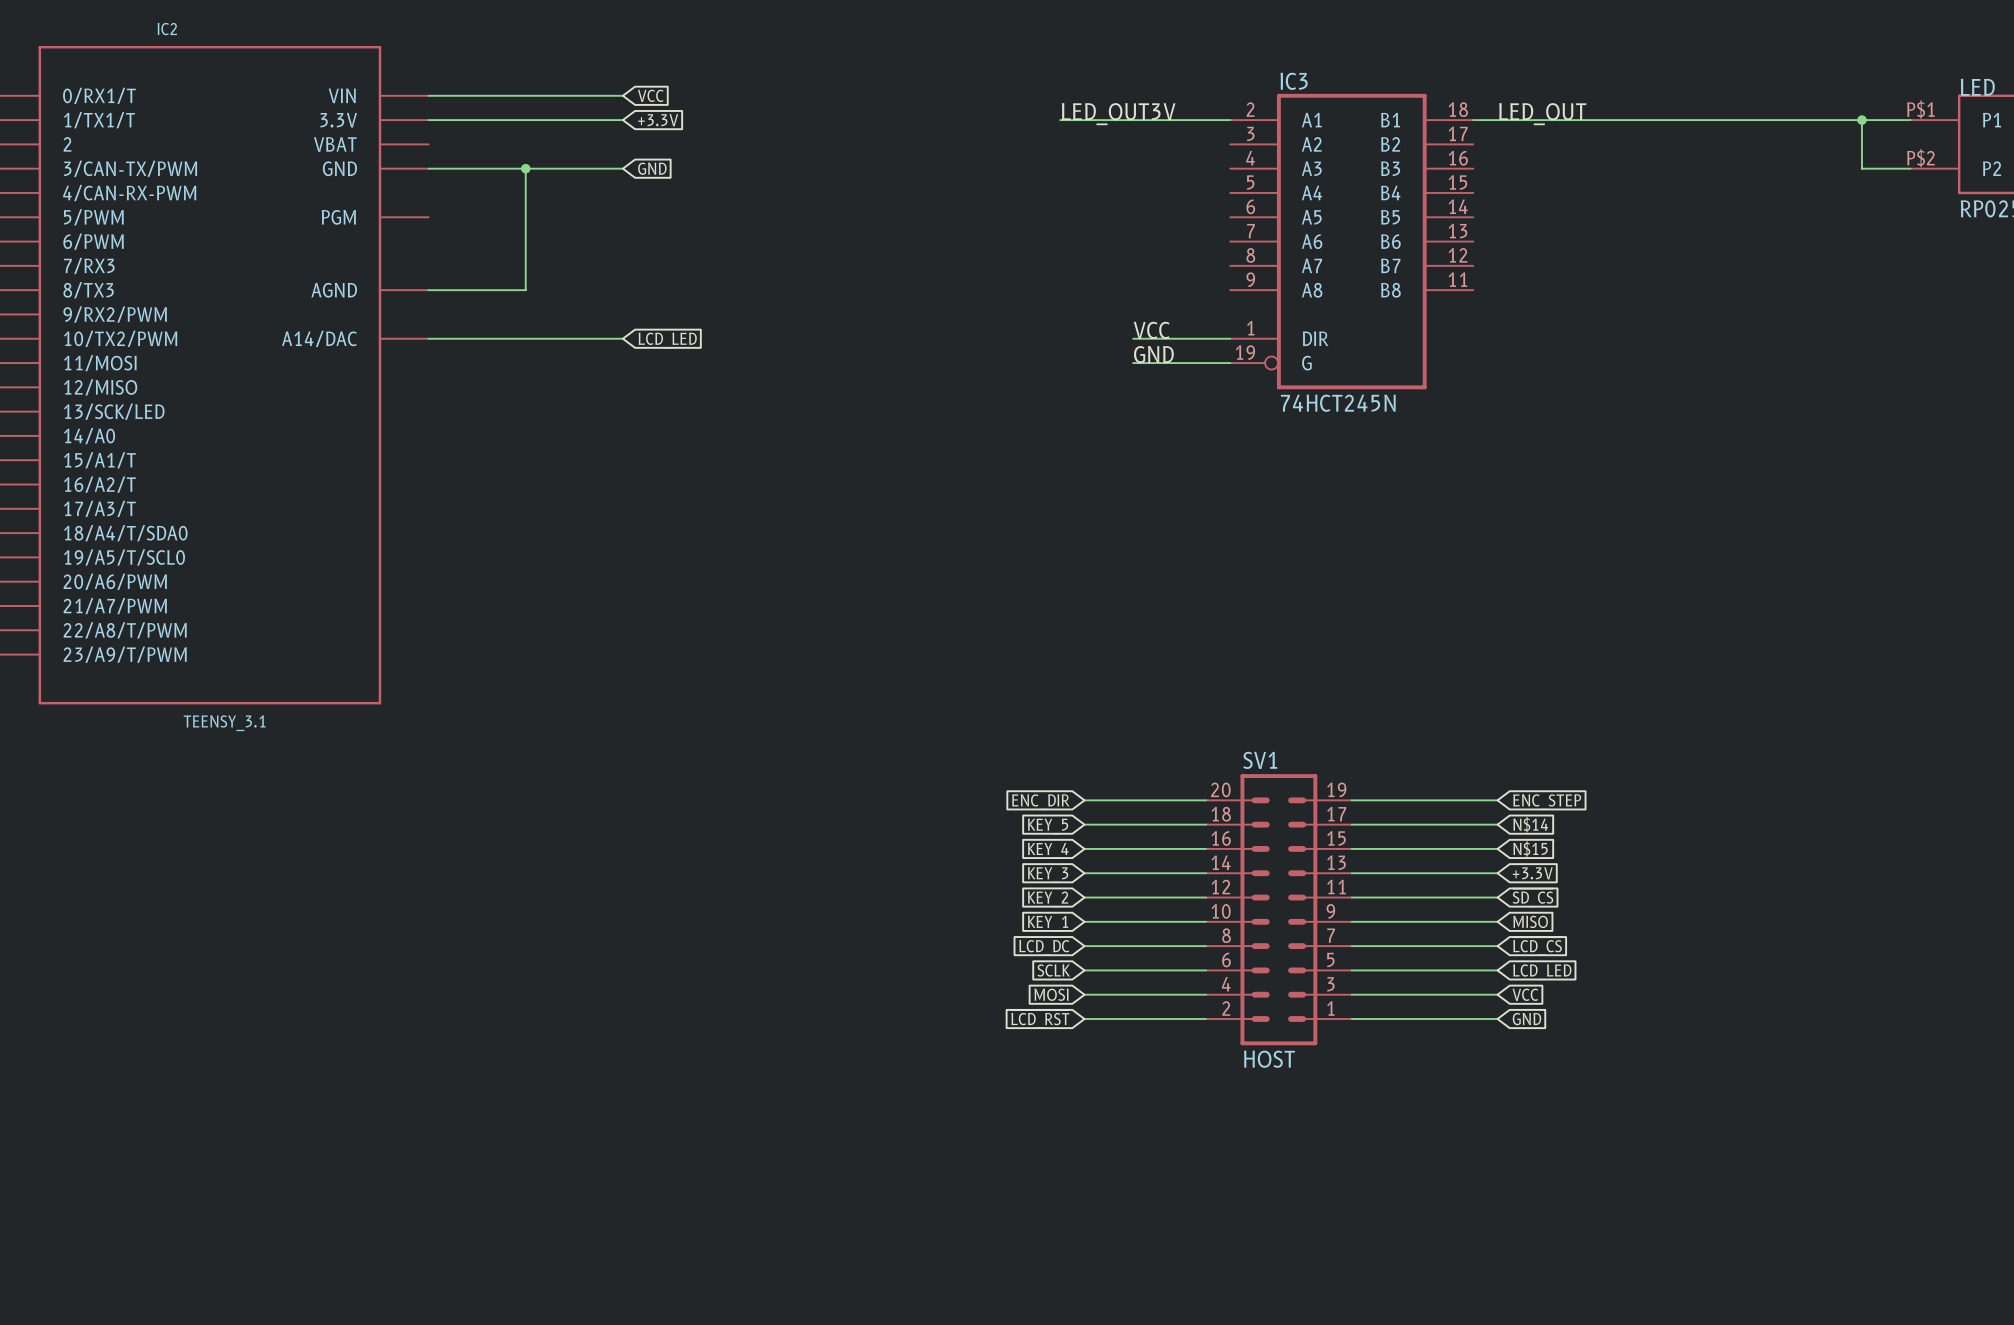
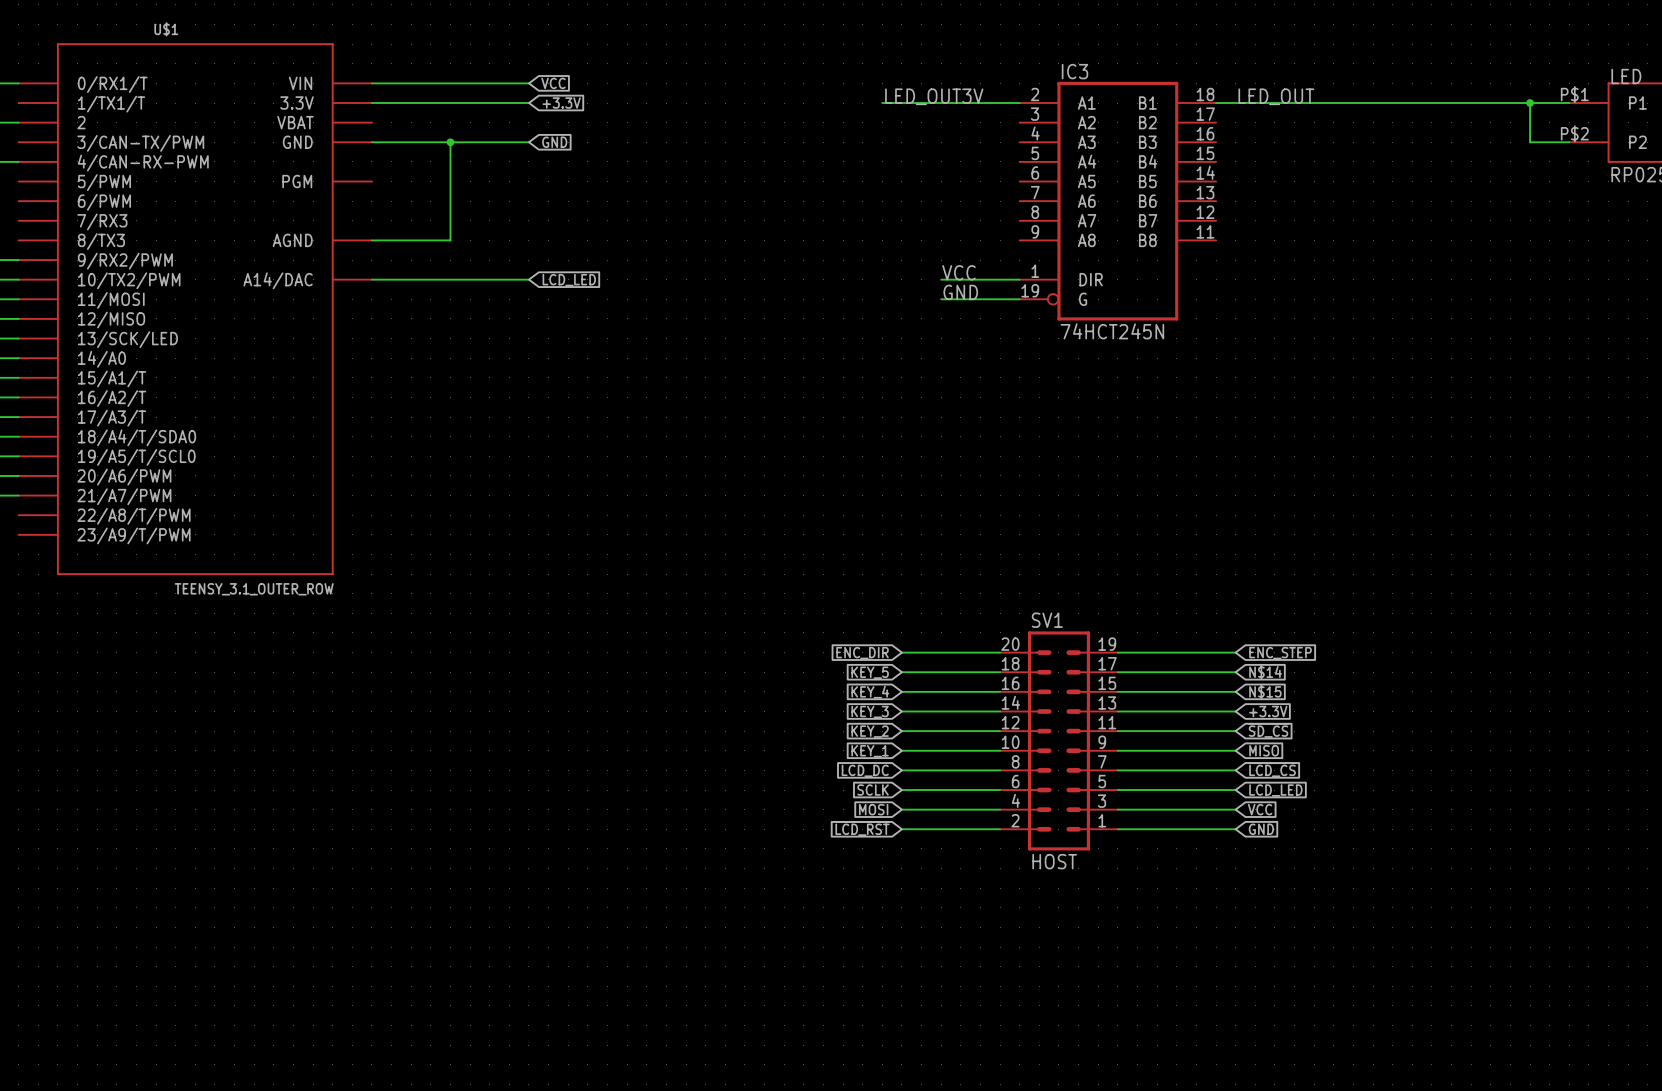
IC2 name: IC2 (167, 29) -> U$1 (166, 29)
IC2 value: TEENSY_3.1 (224, 723) -> TEENSY_3.1_OUTER_ROW (254, 589)

